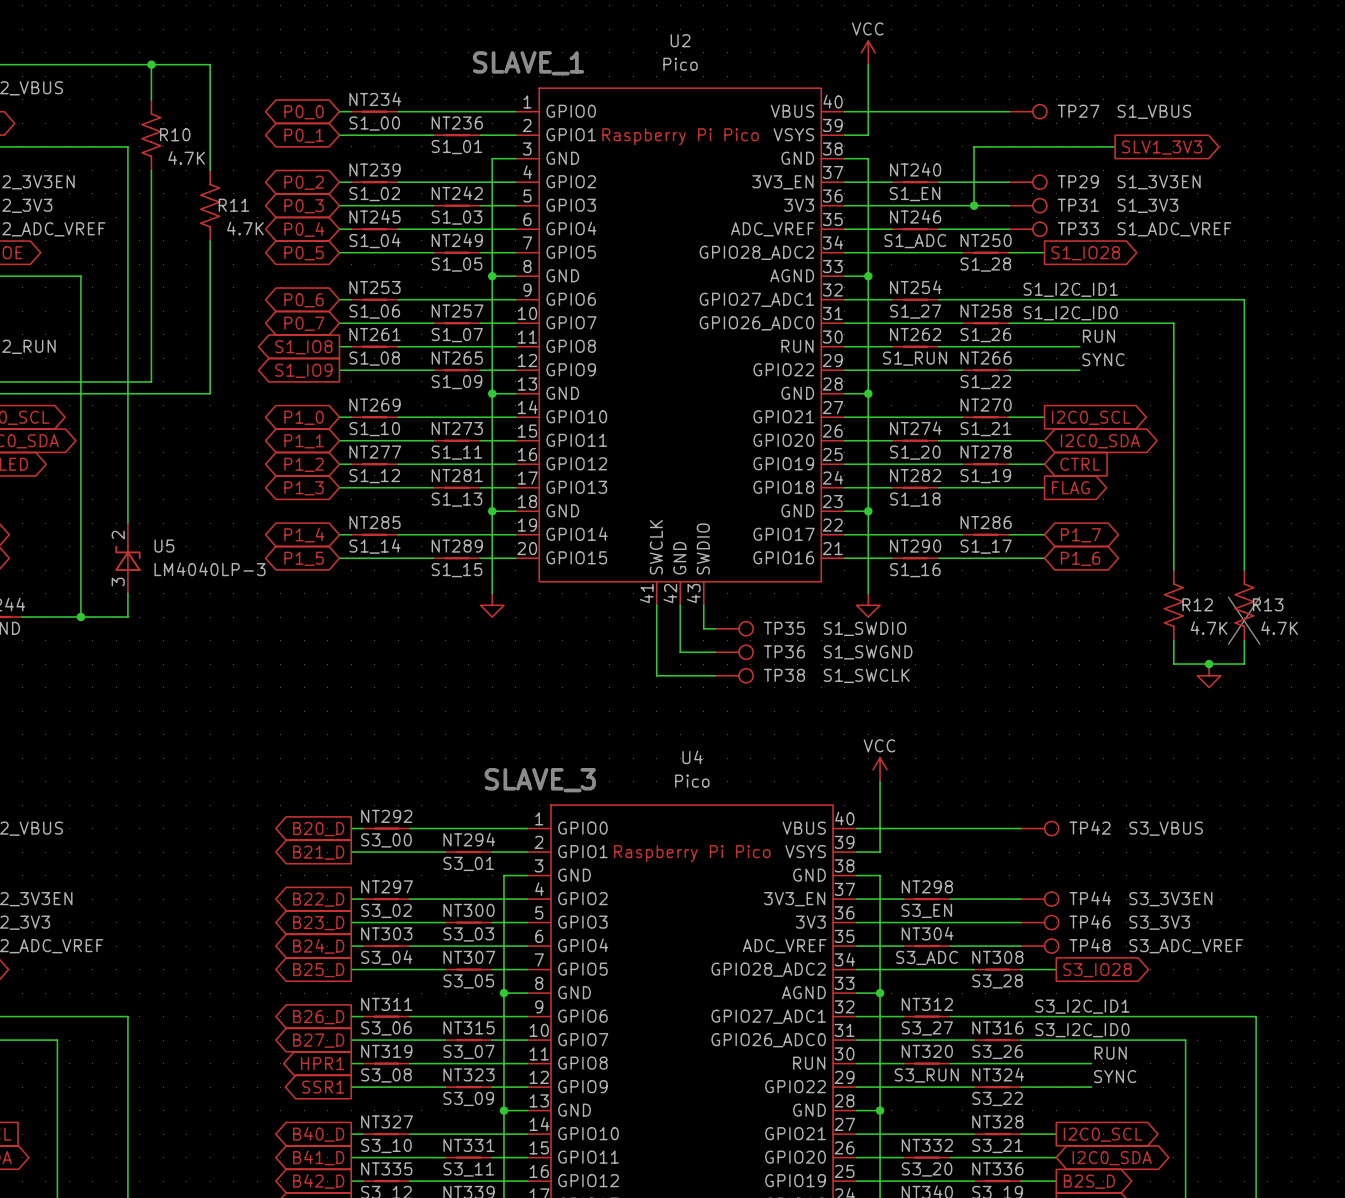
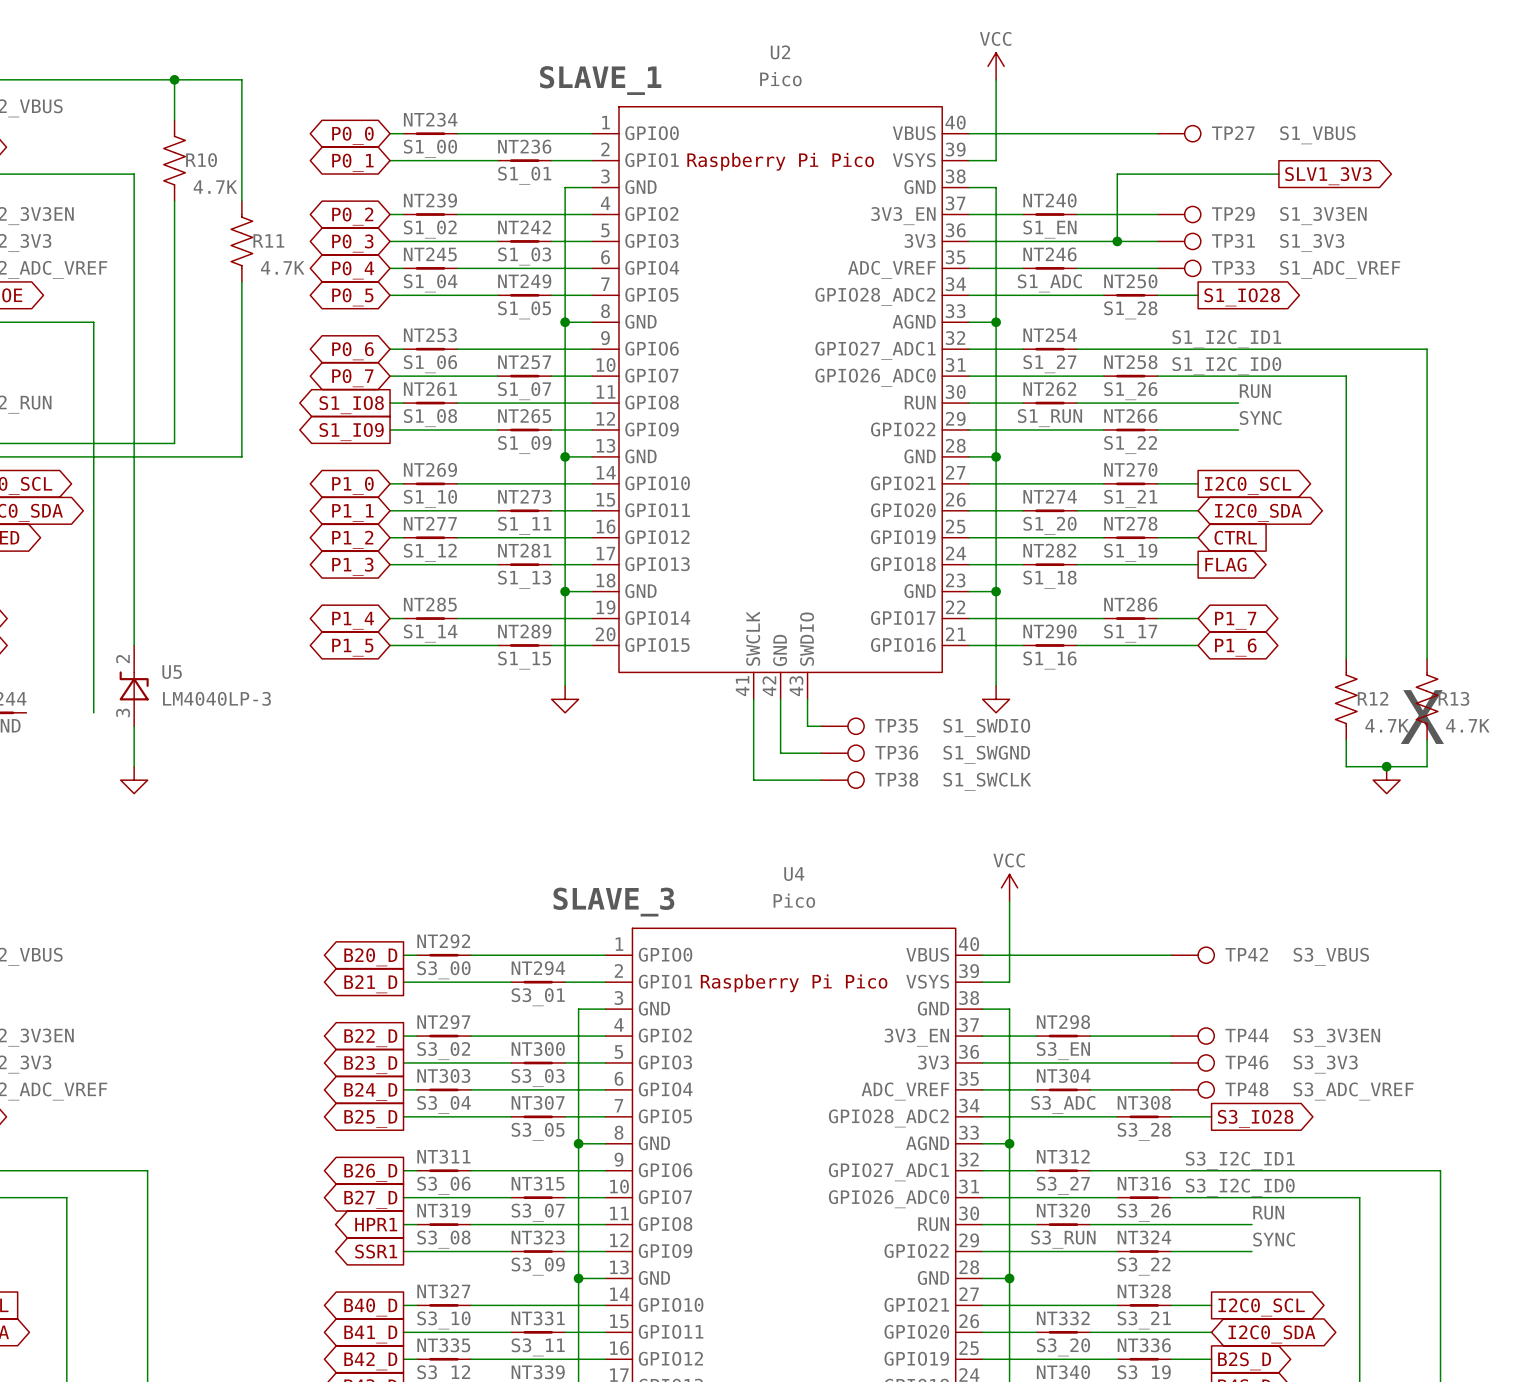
wire: (116, 146) (127, 146) (127, 523) -> (134, 174) (134, 645)
U5 position: (127, 558) -> (134, 685)
wire: (127, 593) (127, 617) (22, 617) -> none
junction: (80, 617) -> none
wire: none -> (134, 726) (134, 766)
power symbol: none -> (134, 780)

